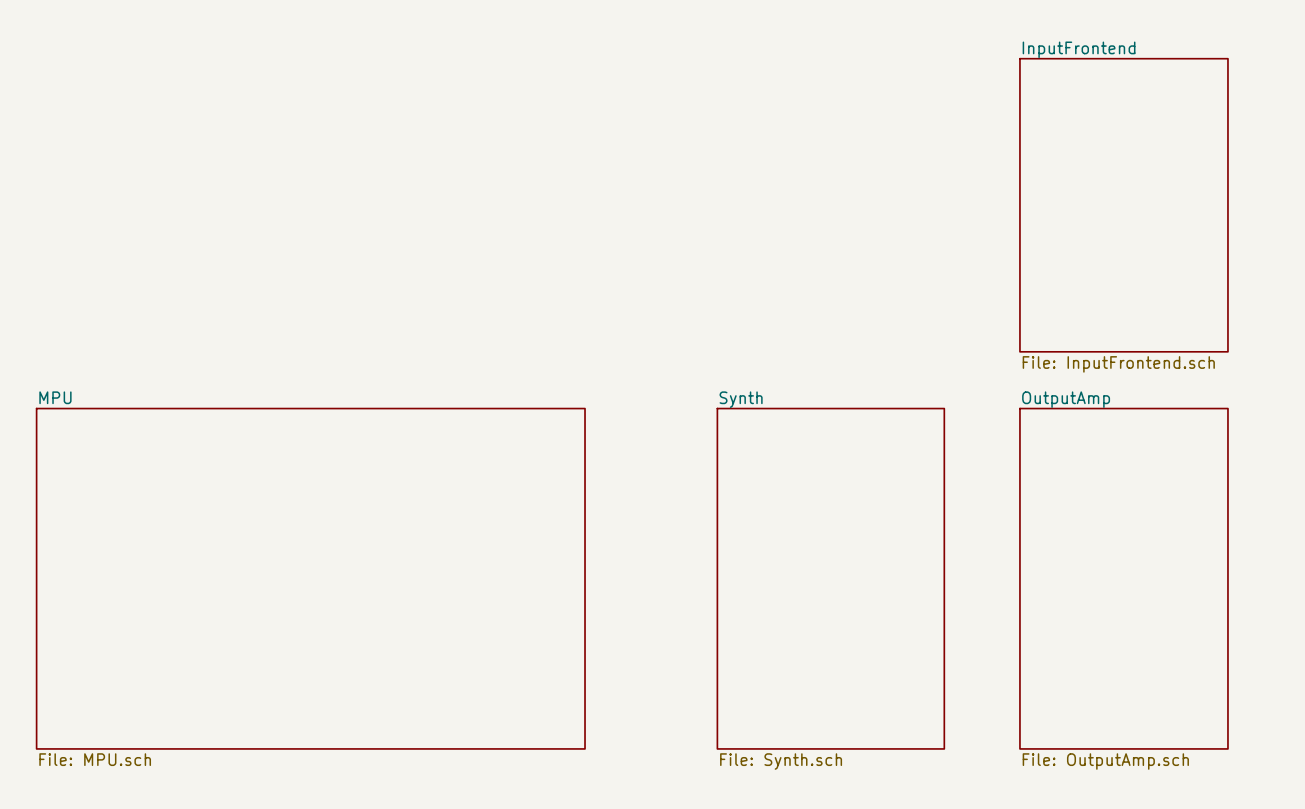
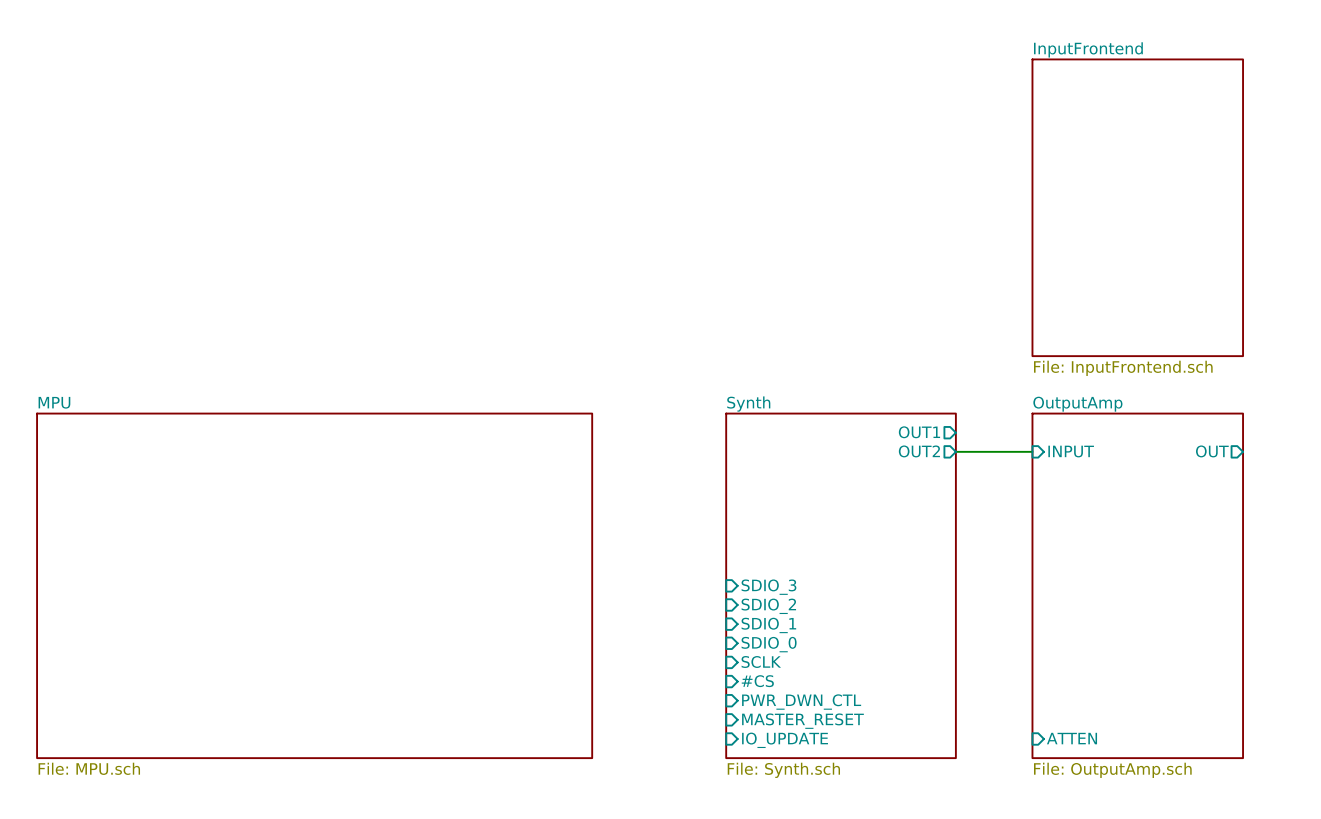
sheet pin: none -> OUT1 (919, 432)
sheet pin: none -> OUT2 (919, 451)
sheet pin: none -> INPUT (1071, 451)
sheet pin: none -> OUT (1212, 451)
wire: none -> (955, 451) (1032, 451)
sheet pin: none -> SDIO_3 (768, 587)
sheet pin: none -> SDIO_2 (768, 606)
sheet pin: none -> SDIO_1 (768, 625)
sheet pin: none -> SDIO_0 (769, 644)
sheet pin: none -> SCLK (761, 662)
sheet pin: none -> #CS (757, 681)
sheet pin: none -> PWR_DWN_CTL (801, 702)
sheet pin: none -> MASTER_RESET (802, 721)
sheet pin: none -> ATTEN (1071, 738)
sheet pin: none -> IO_UPDATE (785, 740)

